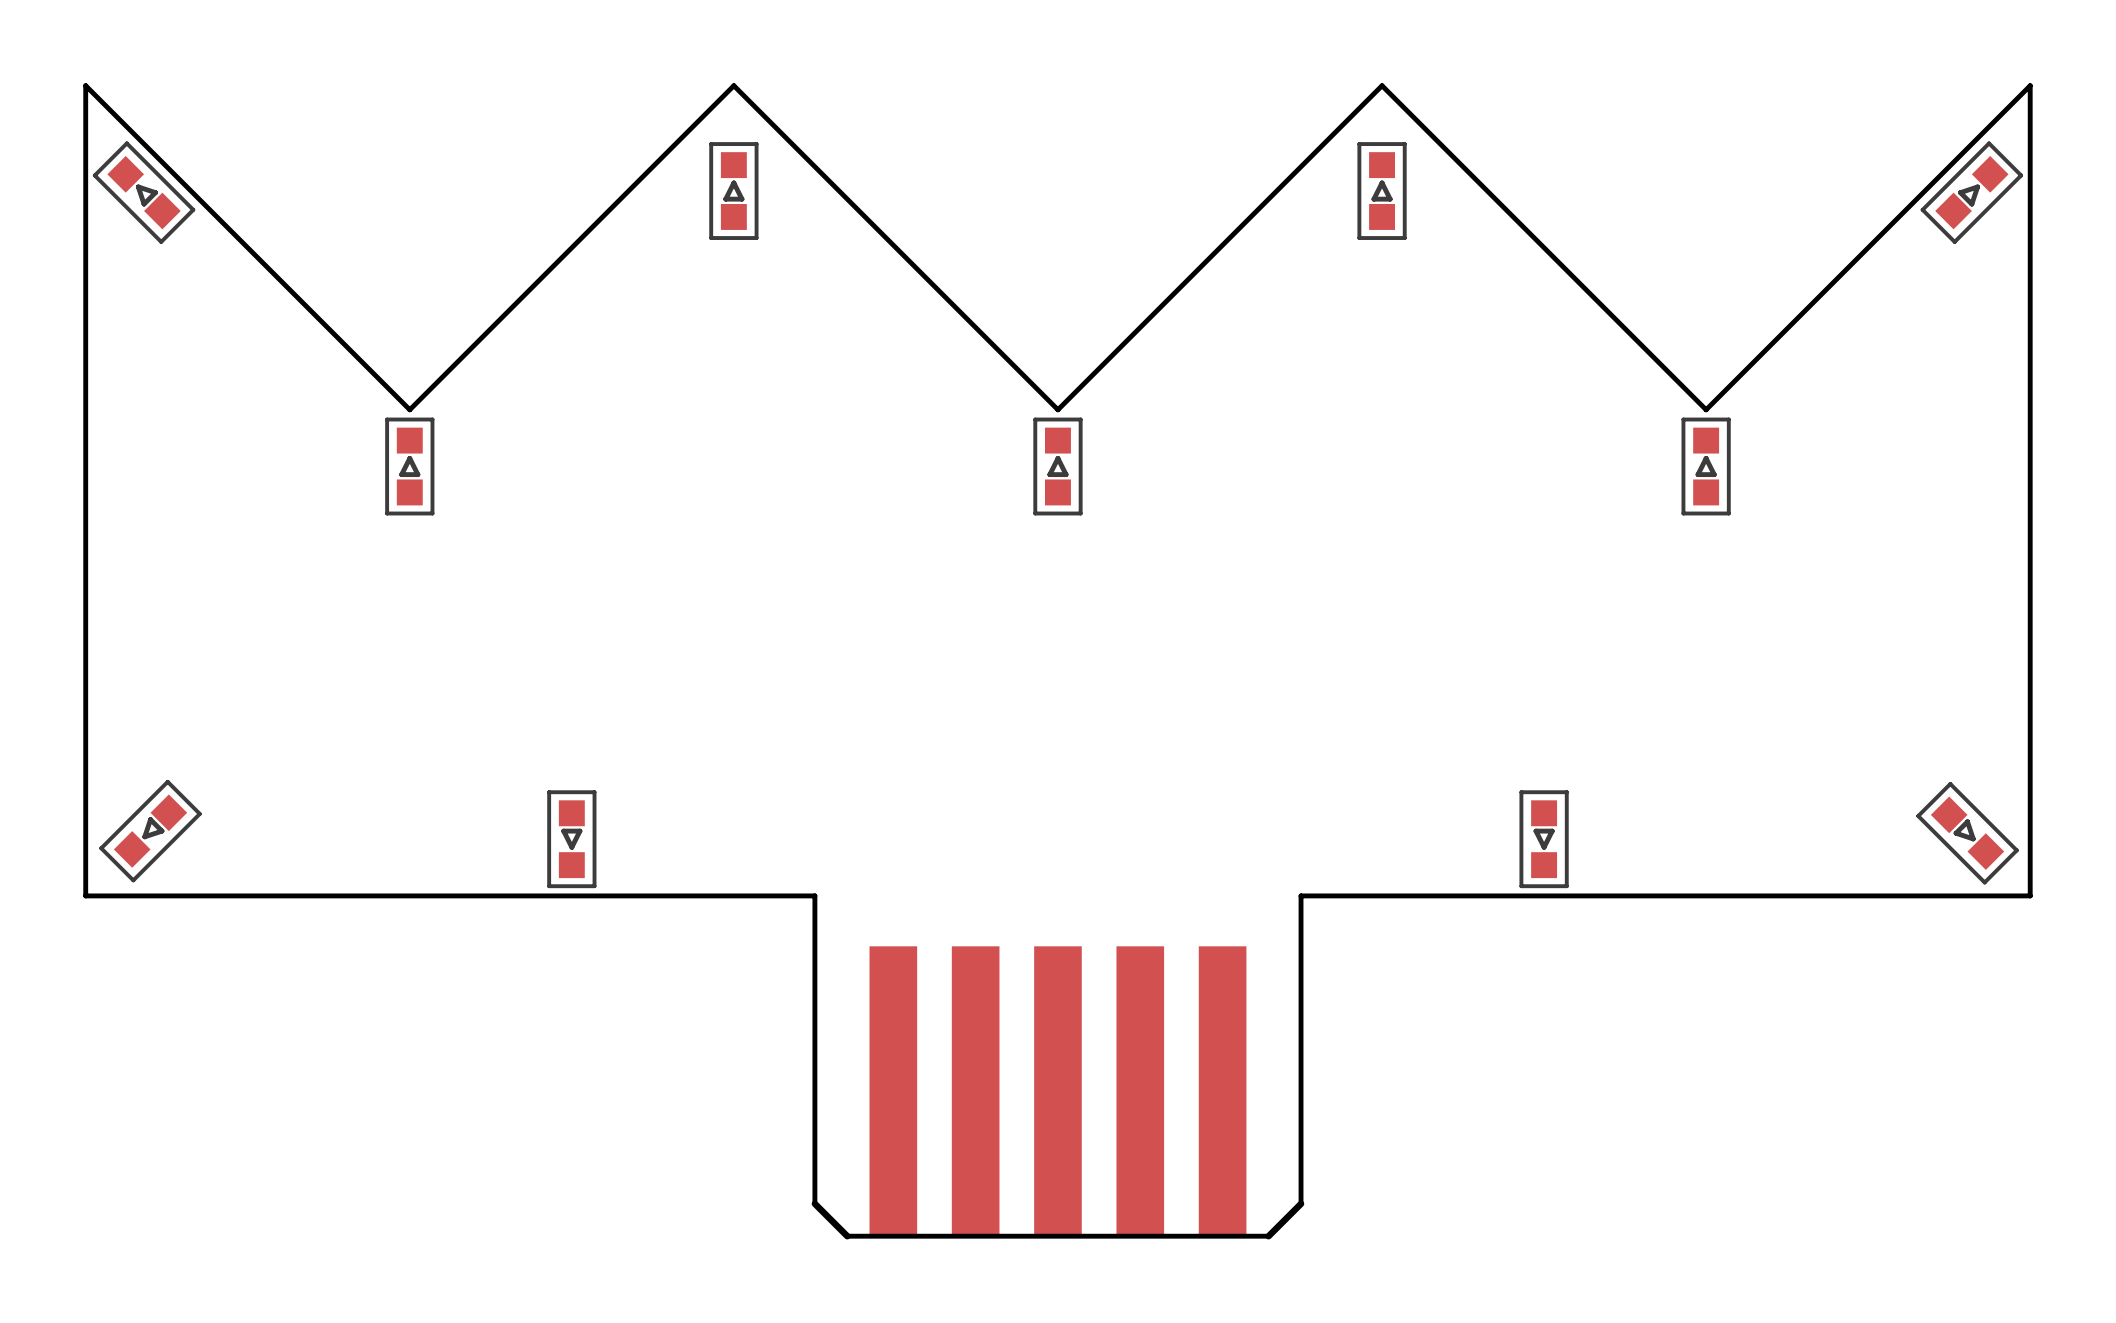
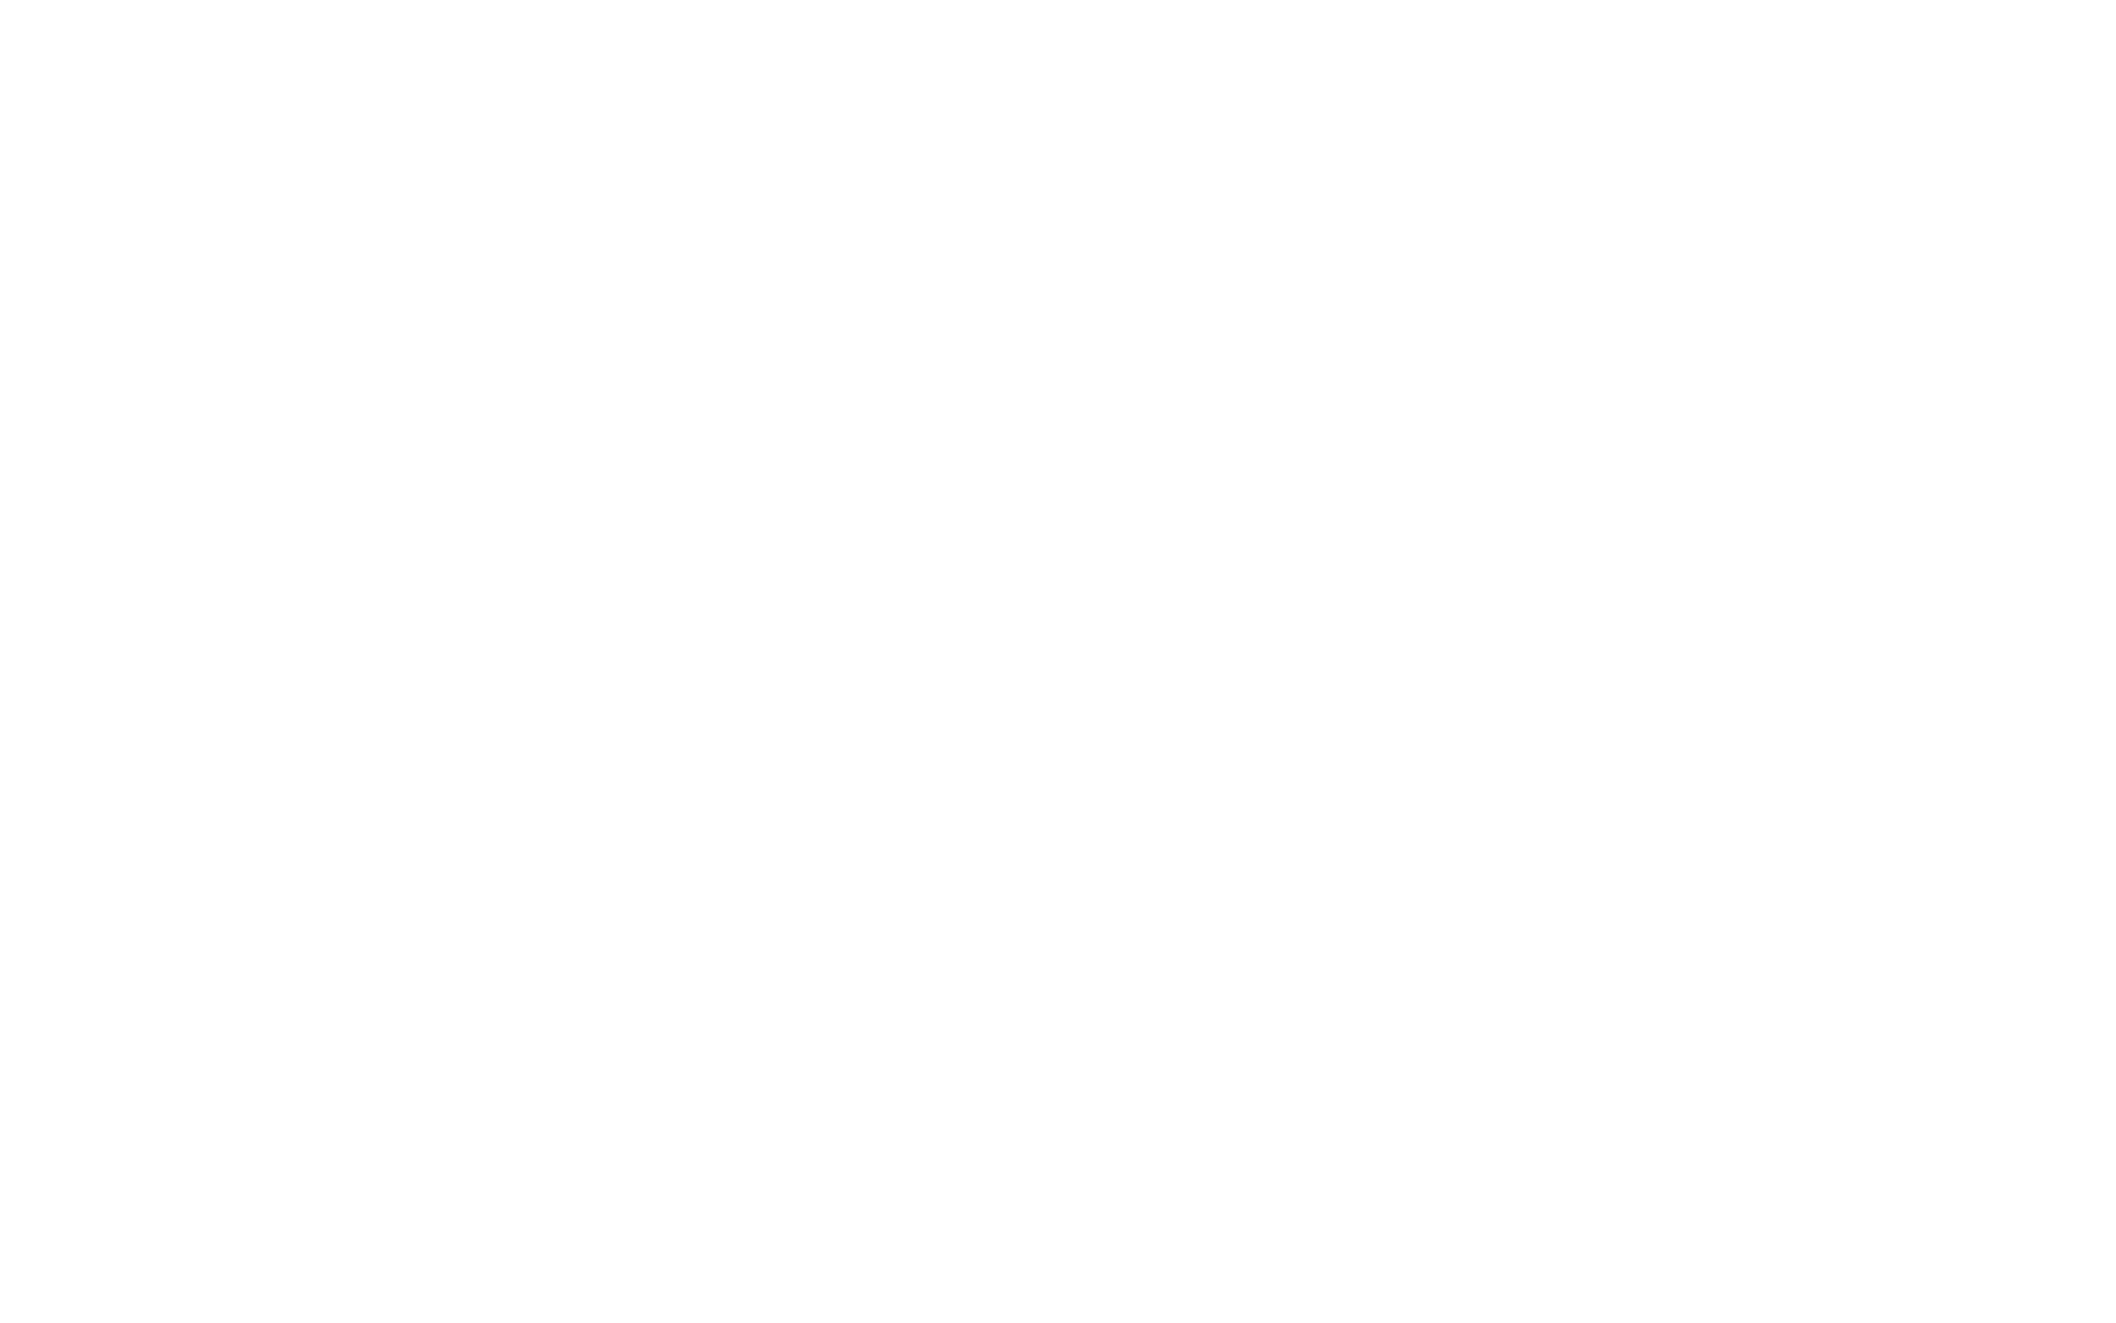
board edge: (85, 85) (409, 409) (733, 85) (1057, 409) (1382, 85) (1706, 409) (2030, 85) (2030, 895) (1301, 895) (1301, 1203) (1268, 1236) (847, 1236) (814, 1203) (814, 895) (85, 895) (85, 85) -> none
part: (733, 191) -> none
part: (1382, 191) -> none
part: (144, 192) -> none
part: (1971, 192) -> none
part: (409, 466) -> none
part: (1057, 466) -> none
part: (1706, 466) -> none
part: (150, 831) -> none
part: (1967, 833) -> none
part: (571, 839) -> none
part: (1544, 839) -> none
part: (1057, 1090) -> none

